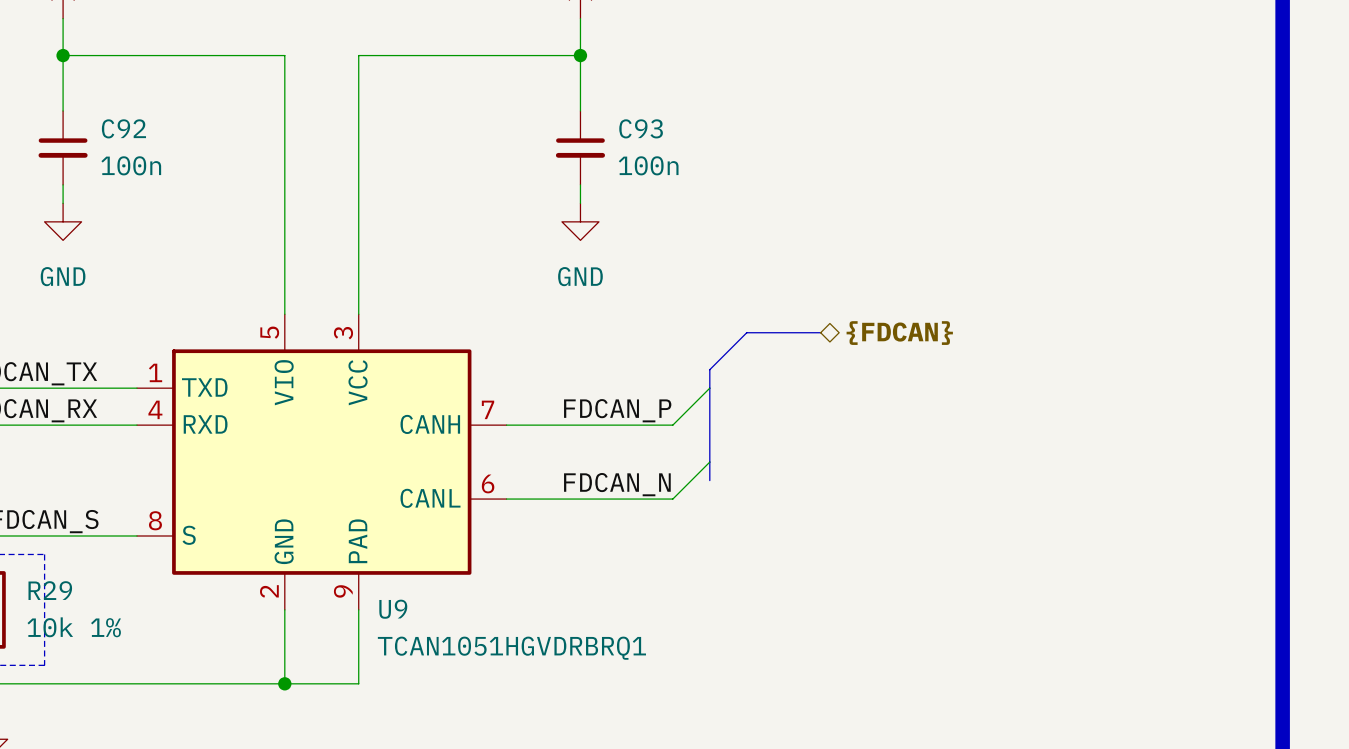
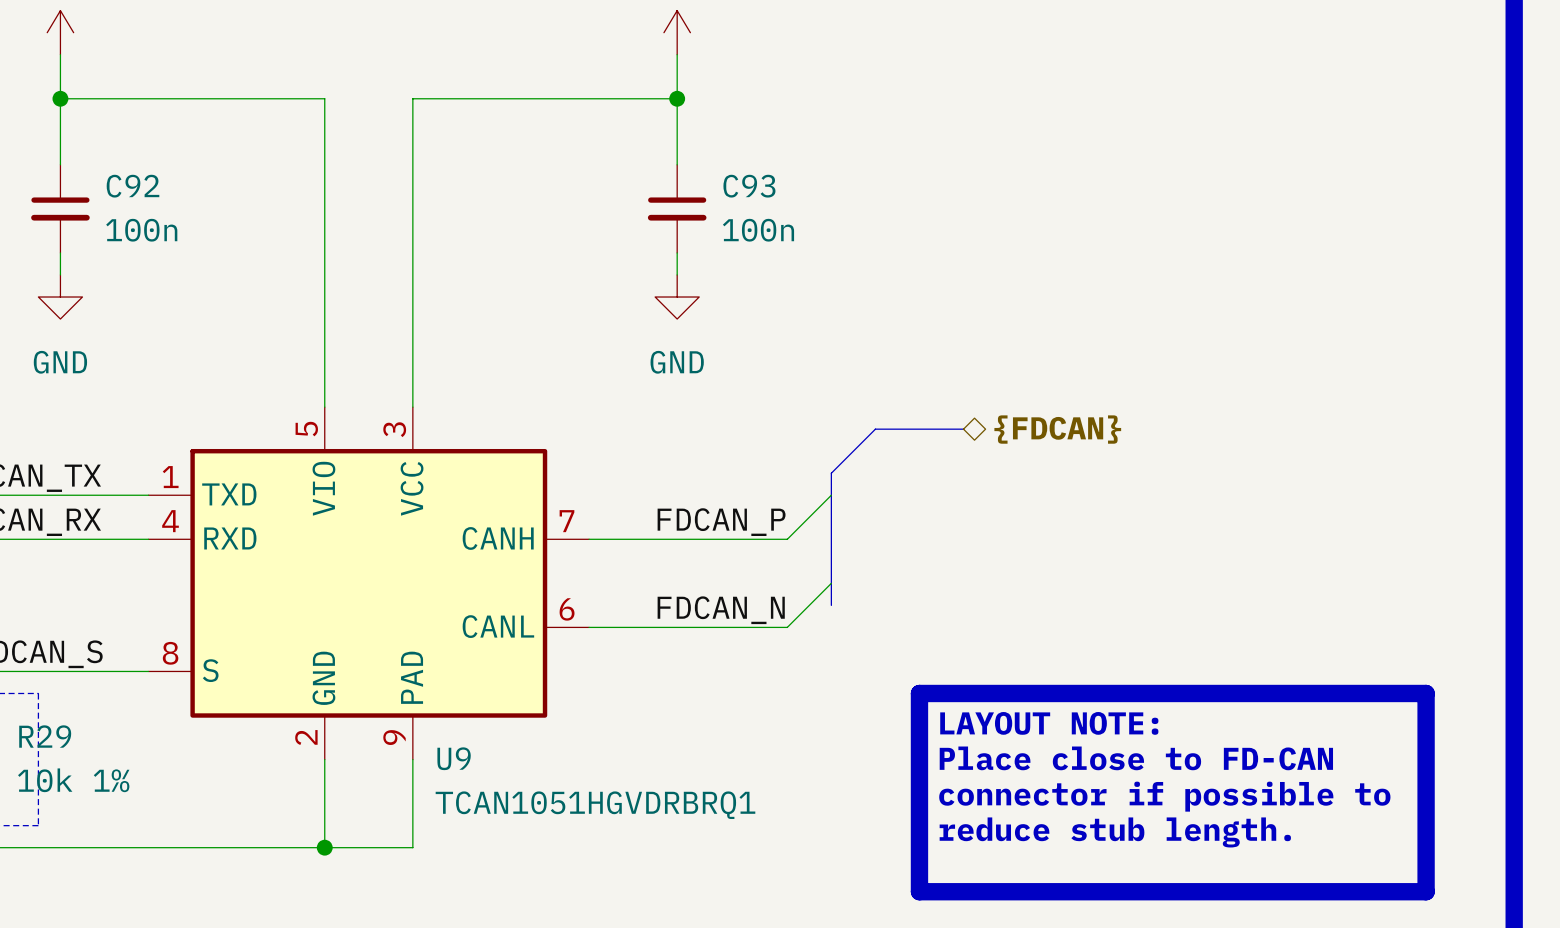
line: none -> (919, 693) (1426, 693) (1426, 891) (919, 891) (919, 693)
text: none -> LAYOUT NOTE: (1049, 723)
text: none -> Place close to FD-CAN (1136, 758)
text: none -> connector if possible to (1164, 796)
text: none -> reduce stub length. (1115, 832)

